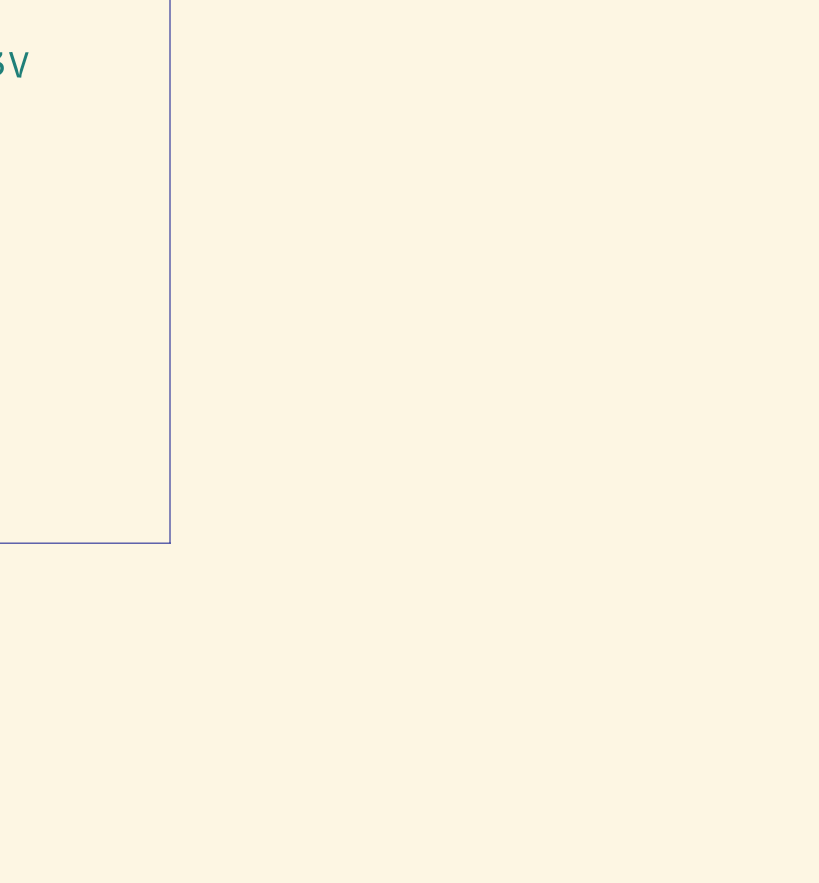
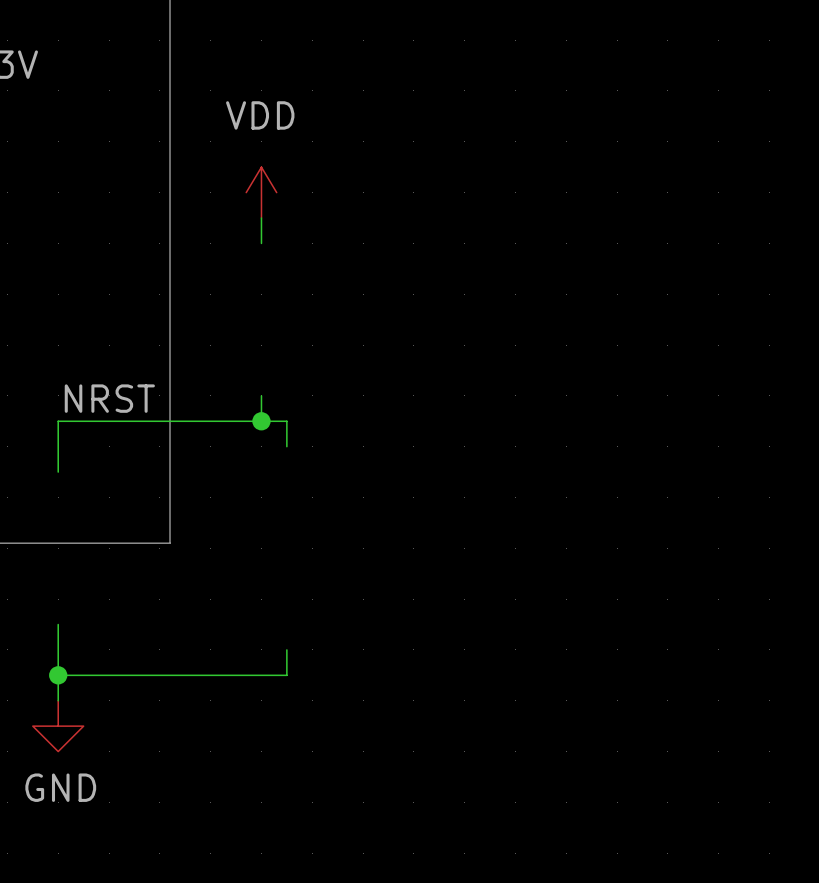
power symbol: none -> VDD (261, 192)
wire: none -> (261, 218) (261, 243)
wire: none -> (261, 395) (261, 421)
label: none -> NRST (109, 398)
junction: none -> (261, 421)
wire: none -> (286, 446) (286, 421) (58, 421) (58, 472)
wire: none -> (58, 624) (58, 700)
wire: none -> (286, 649) (286, 675) (58, 675)
junction: none -> (58, 675)
power symbol: none -> GND (58, 726)

